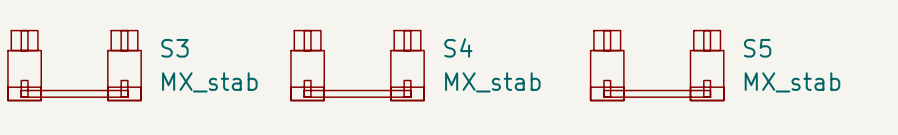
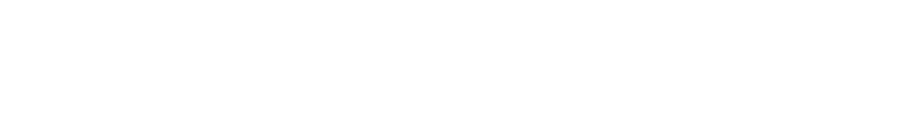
S3: MX_stab (74, 65) -> none
S4: MX_stab (357, 65) -> none
S5: MX_stab (657, 65) -> none

